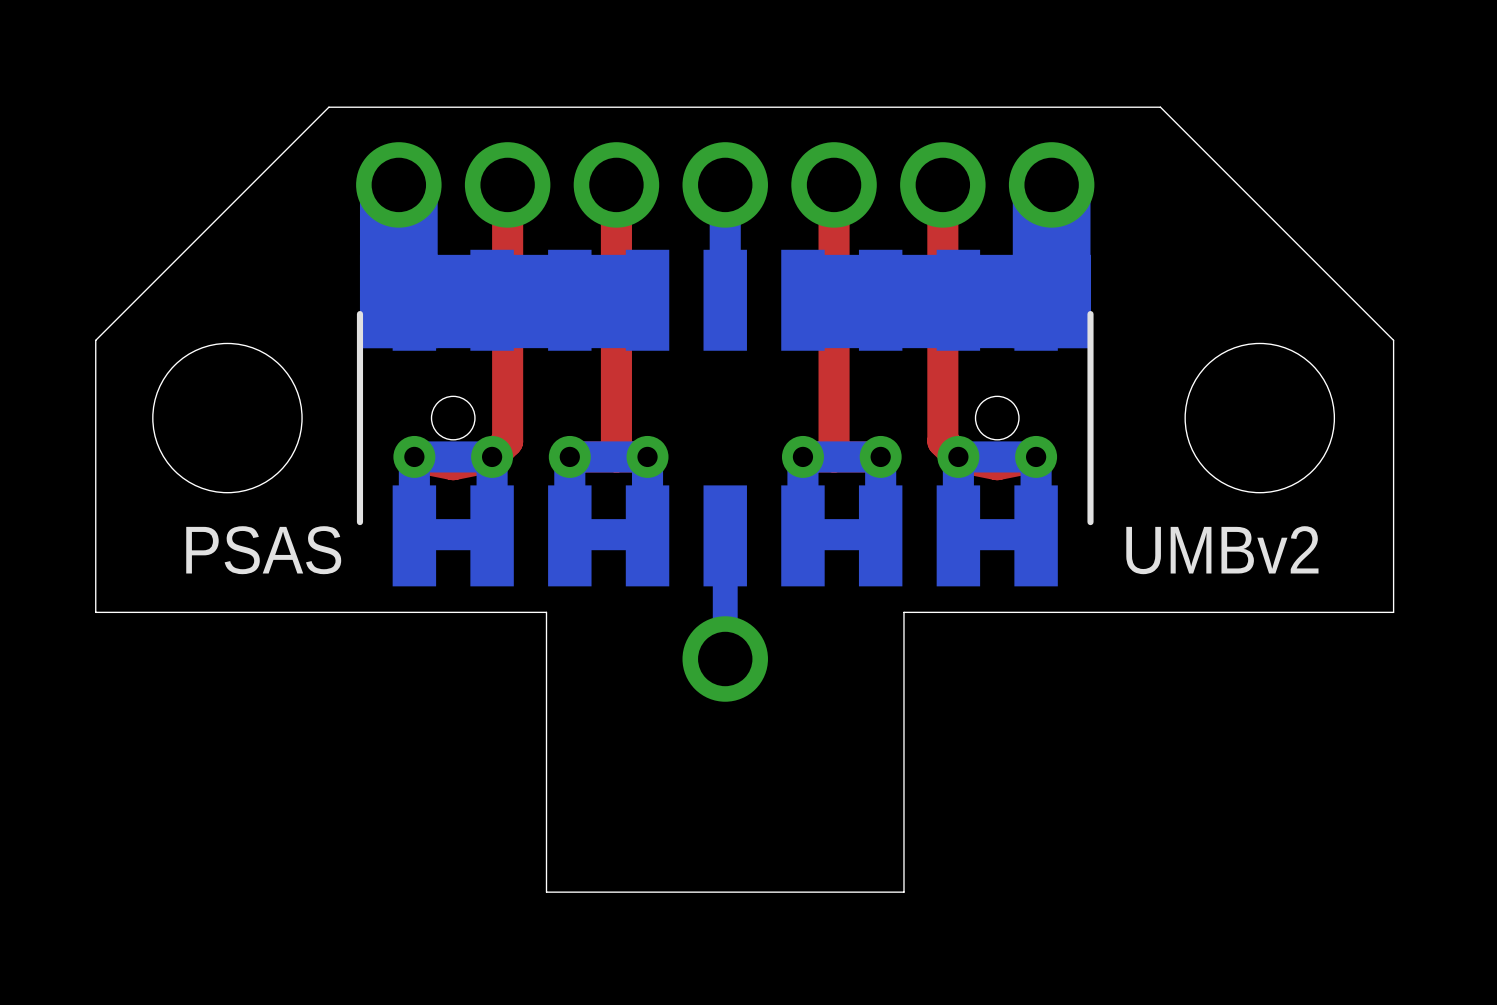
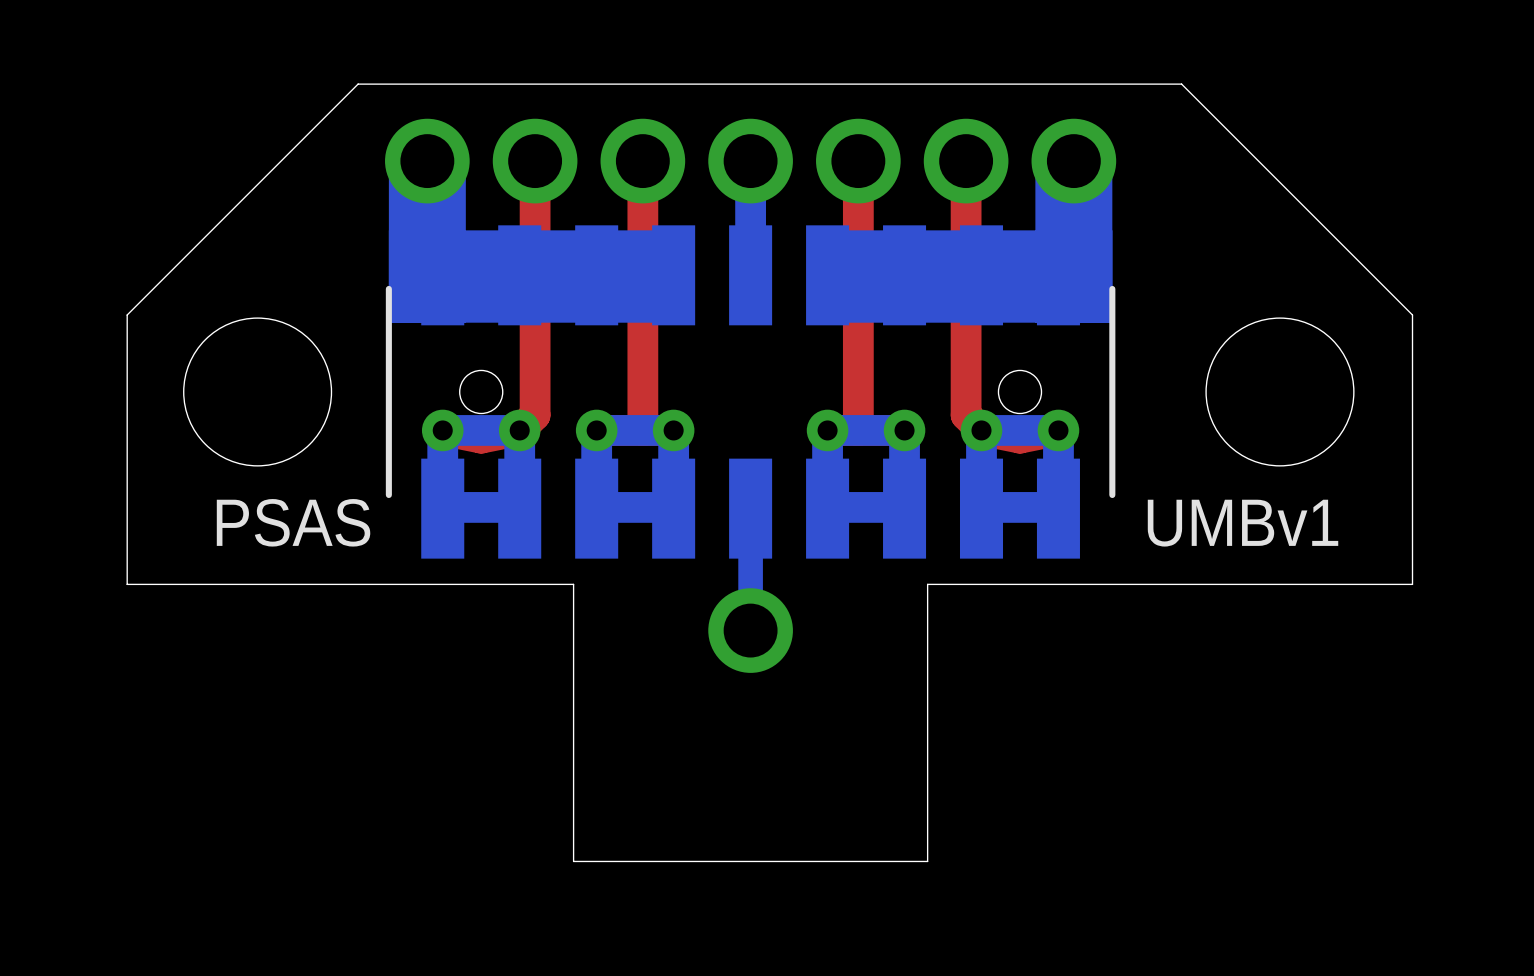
text: UMBv2 (1222, 550) -> UMBv1 (1243, 523)

